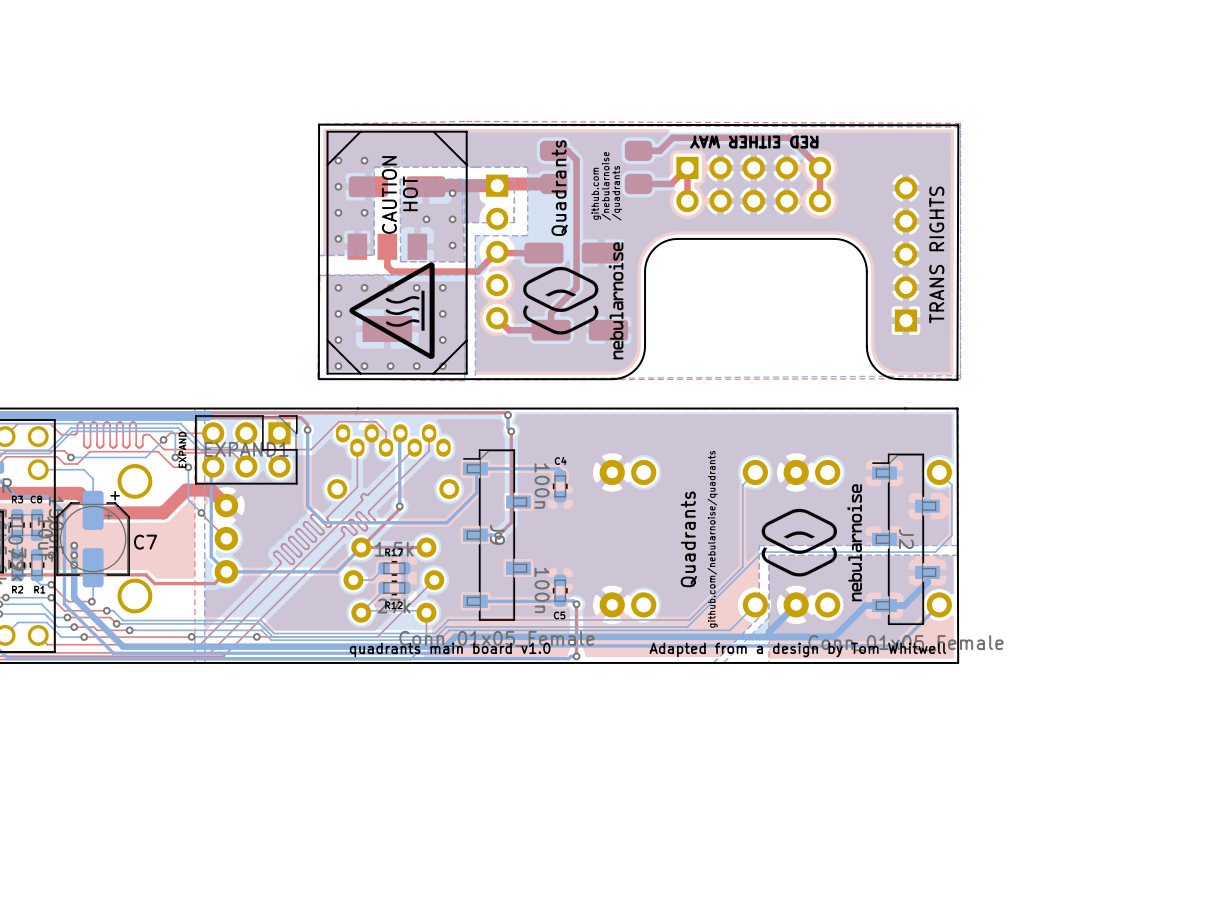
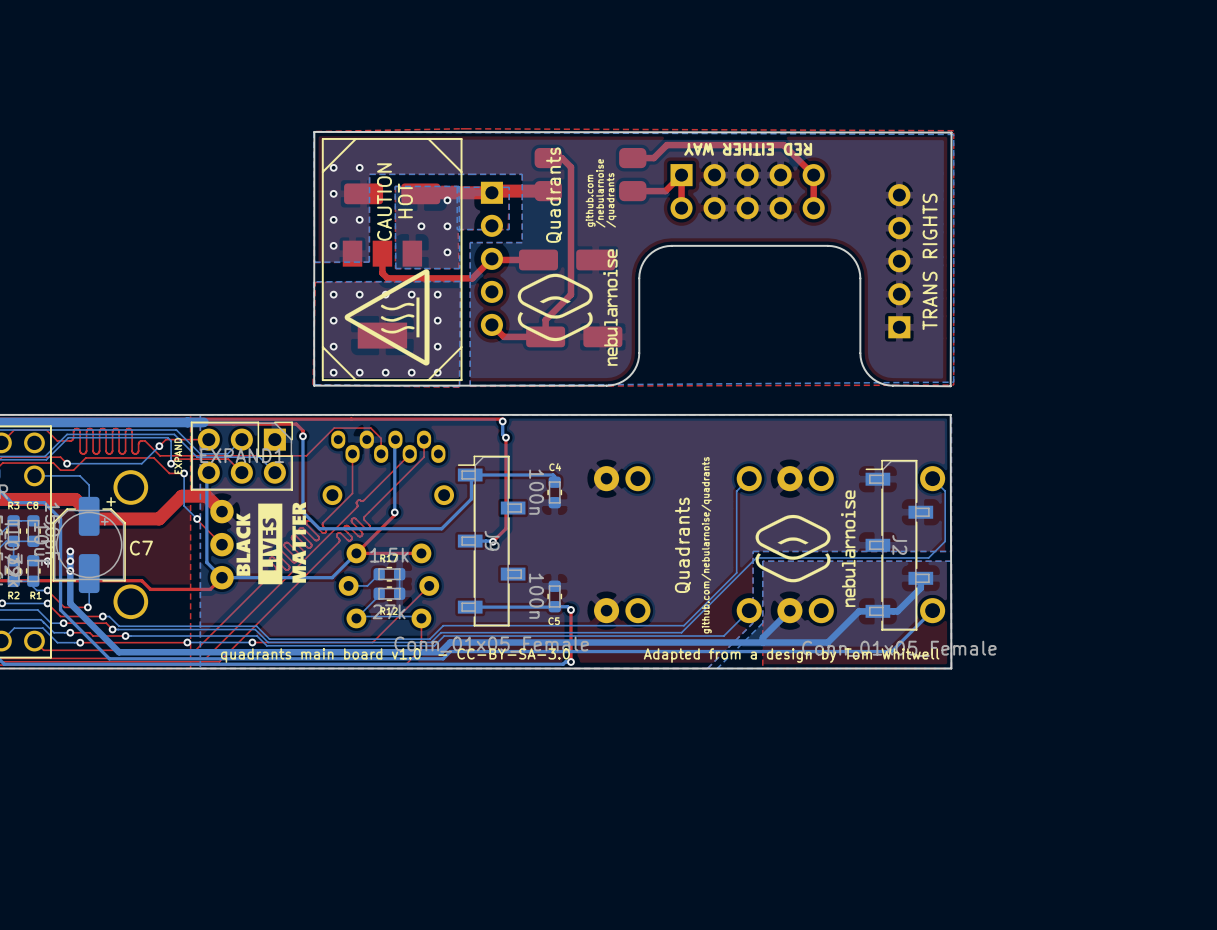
drawing: none -> [236, 502, 307, 585]
text: quadrants main board v1.0 (450, 649) -> quadrants main board v1.0 - CC-BY-SA-3.0 (395, 655)

